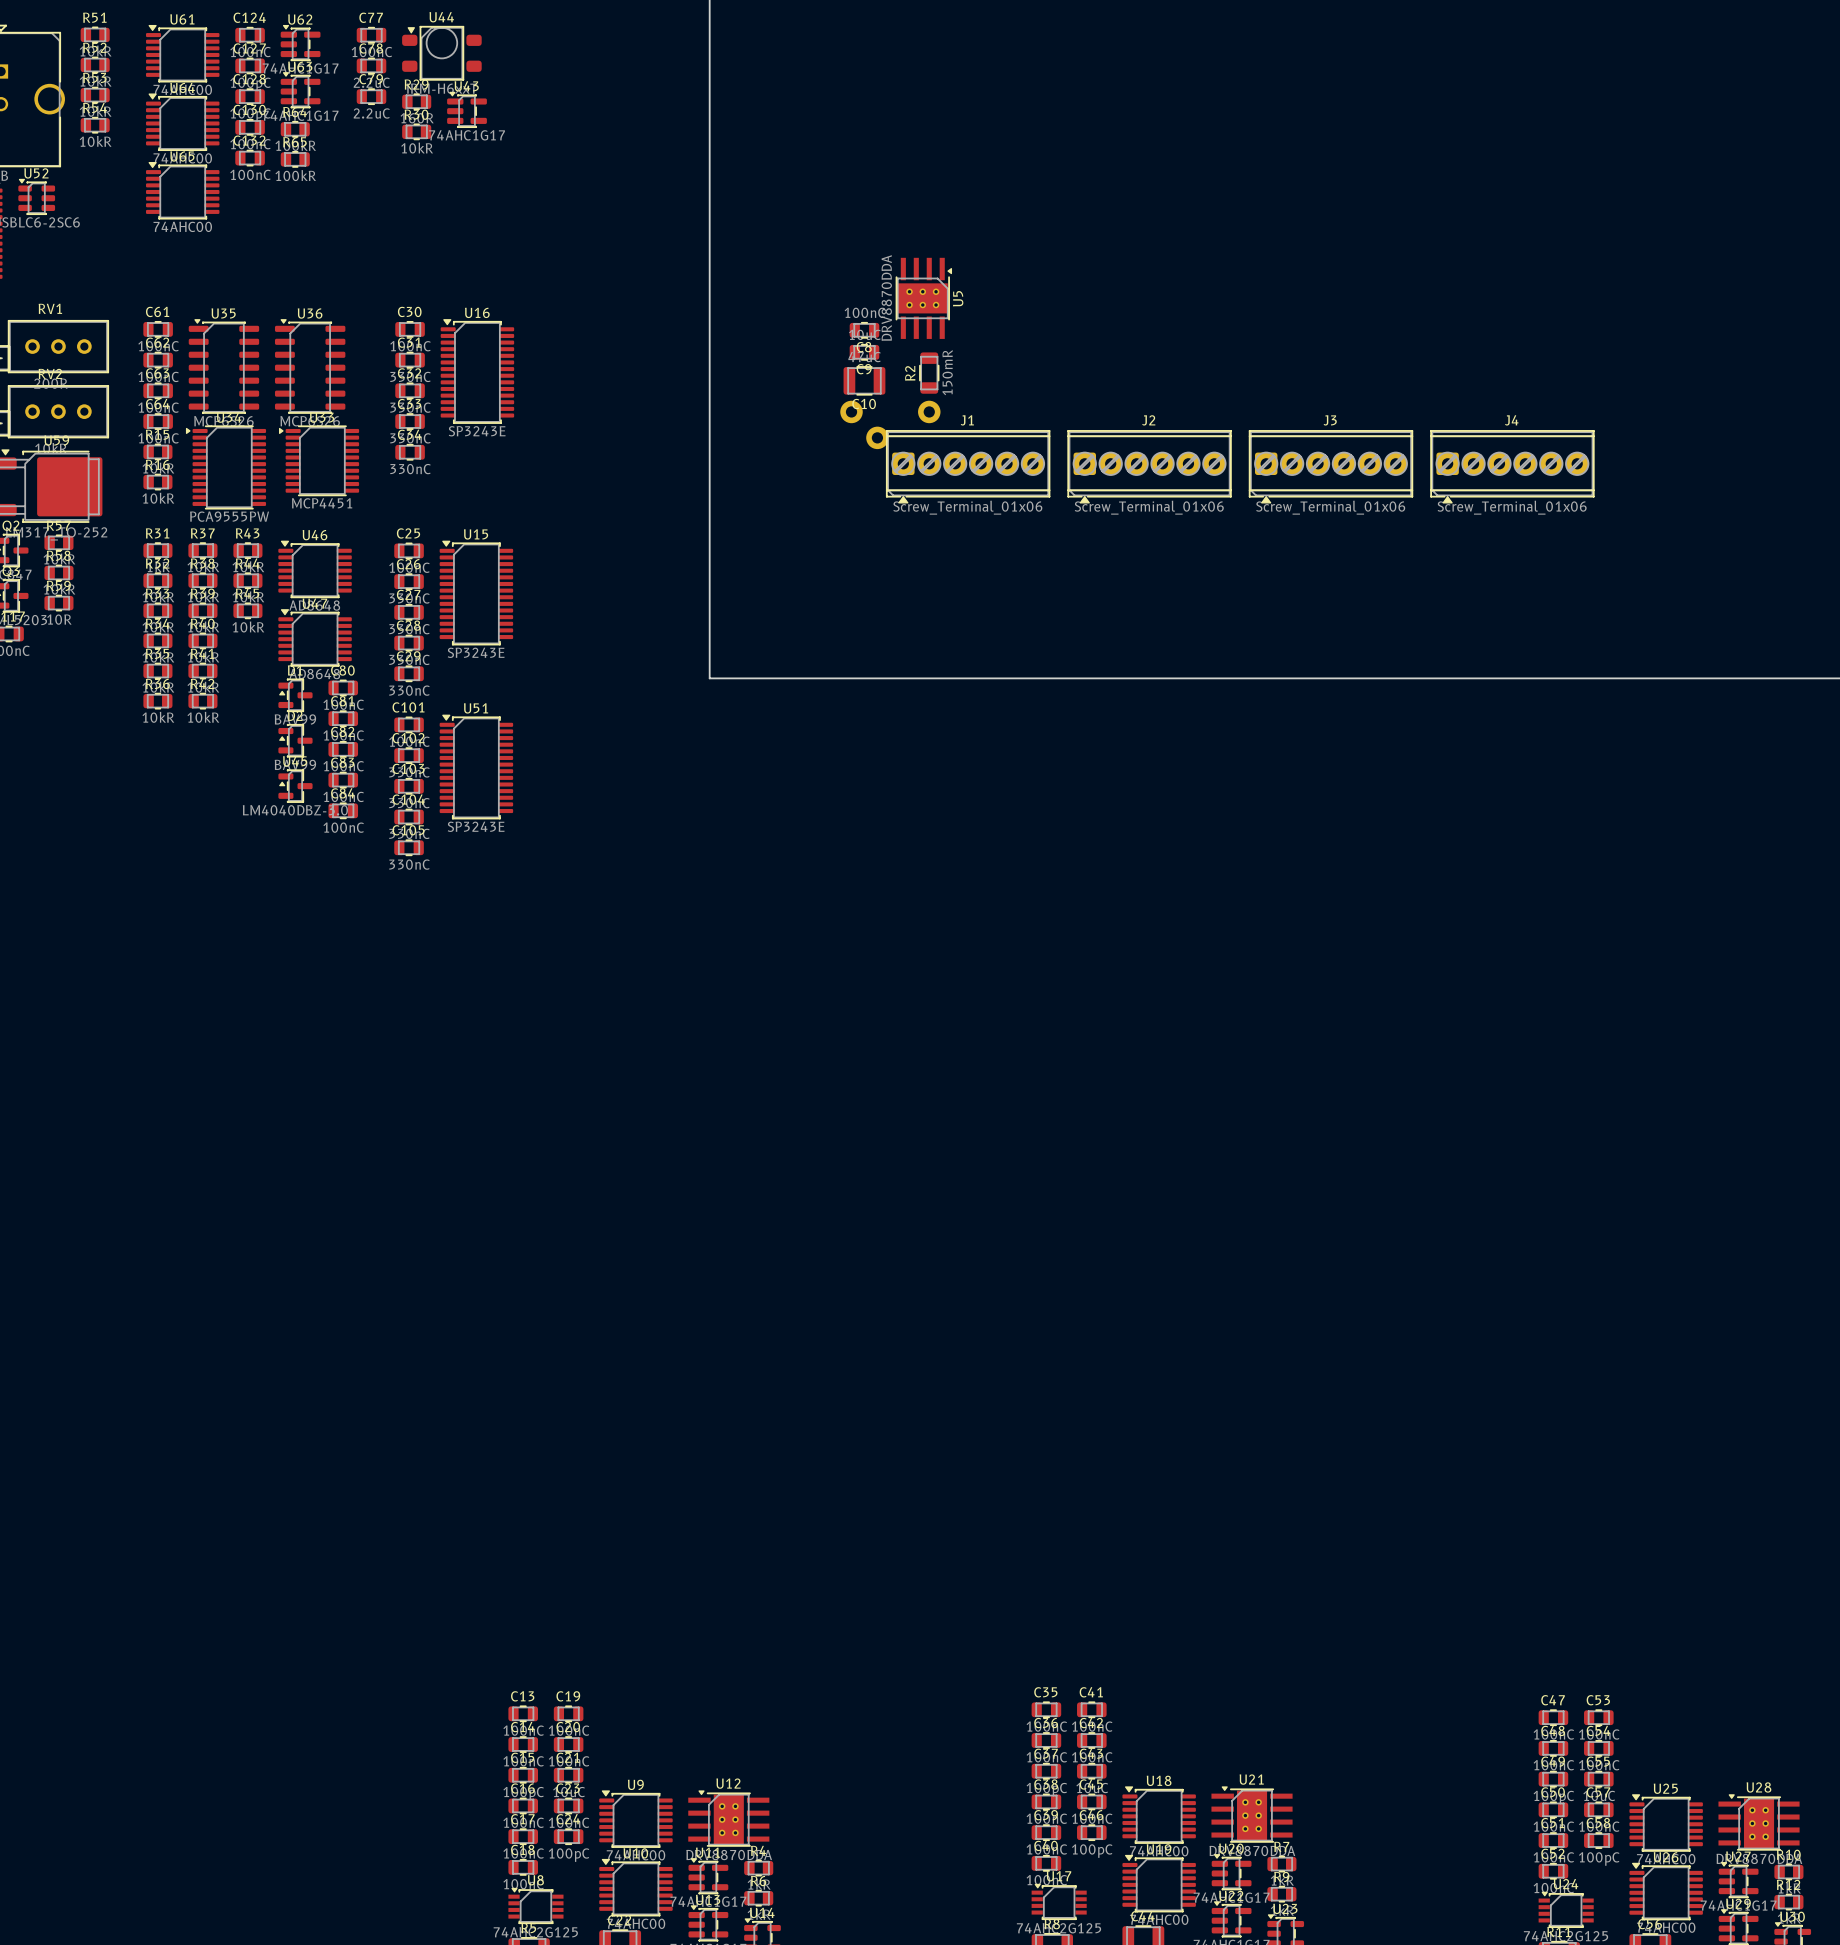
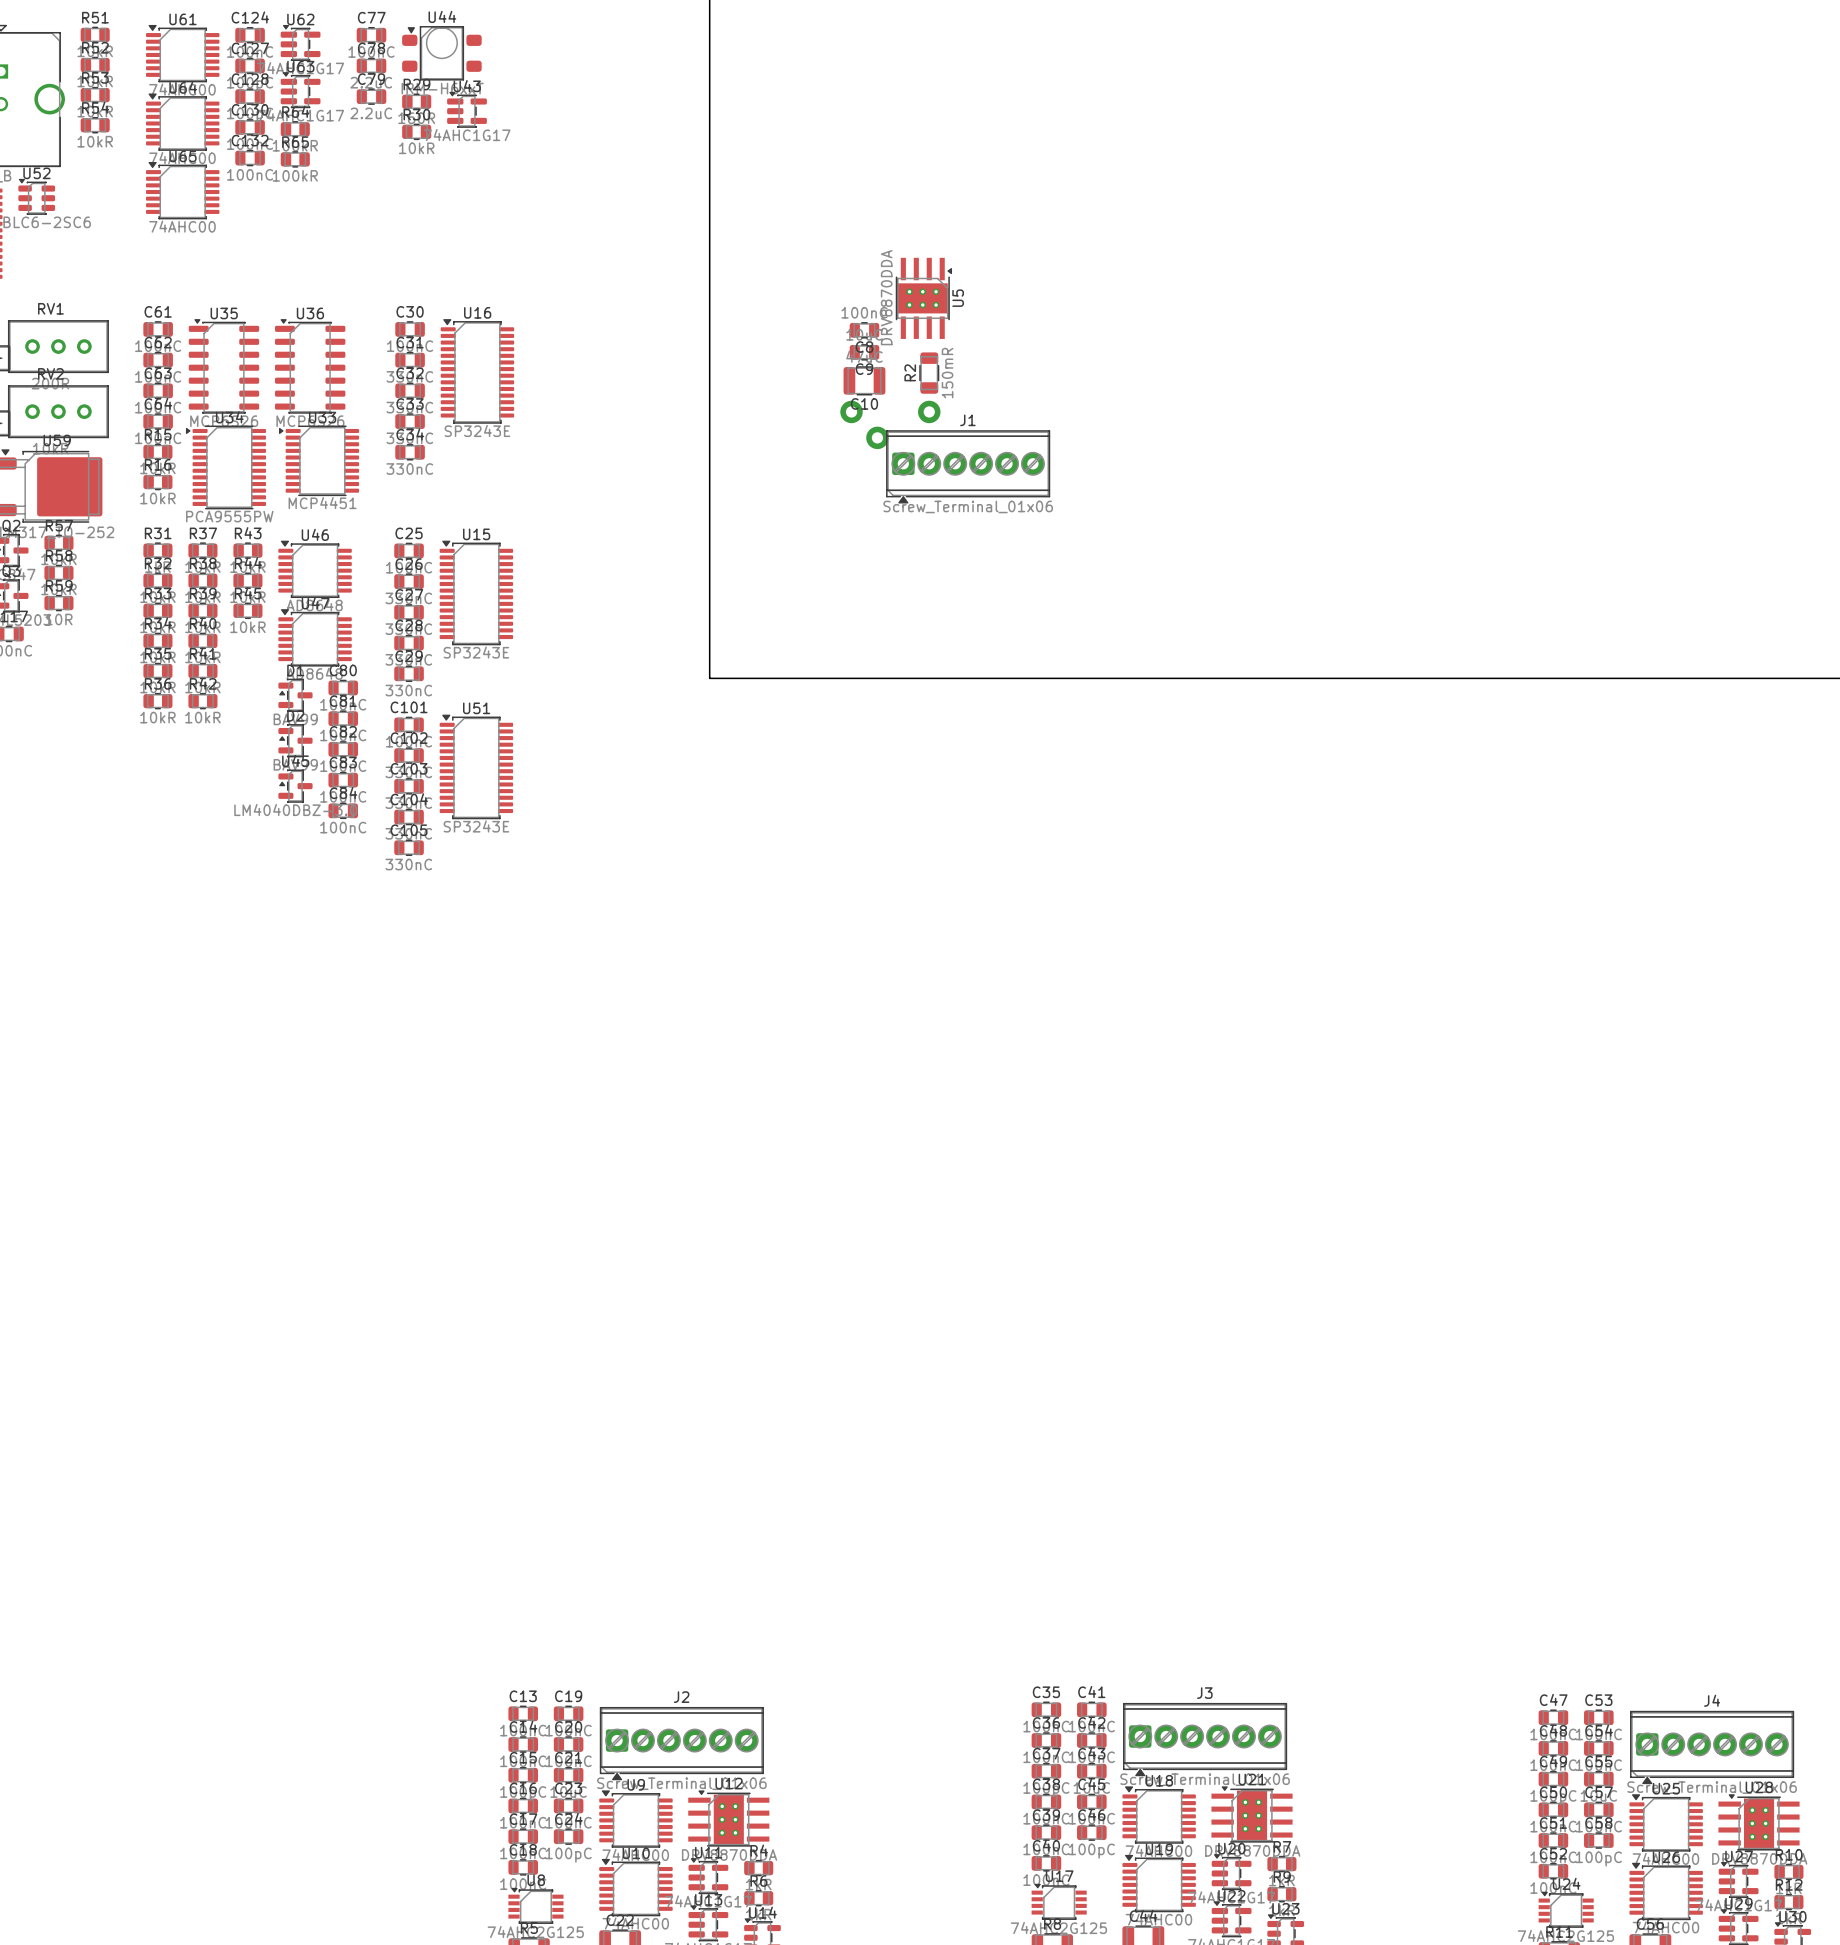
J2 position: (1149, 466) -> (681, 1743)
J3 position: (1331, 466) -> (1205, 1739)
J4 position: (1512, 466) -> (1712, 1747)

